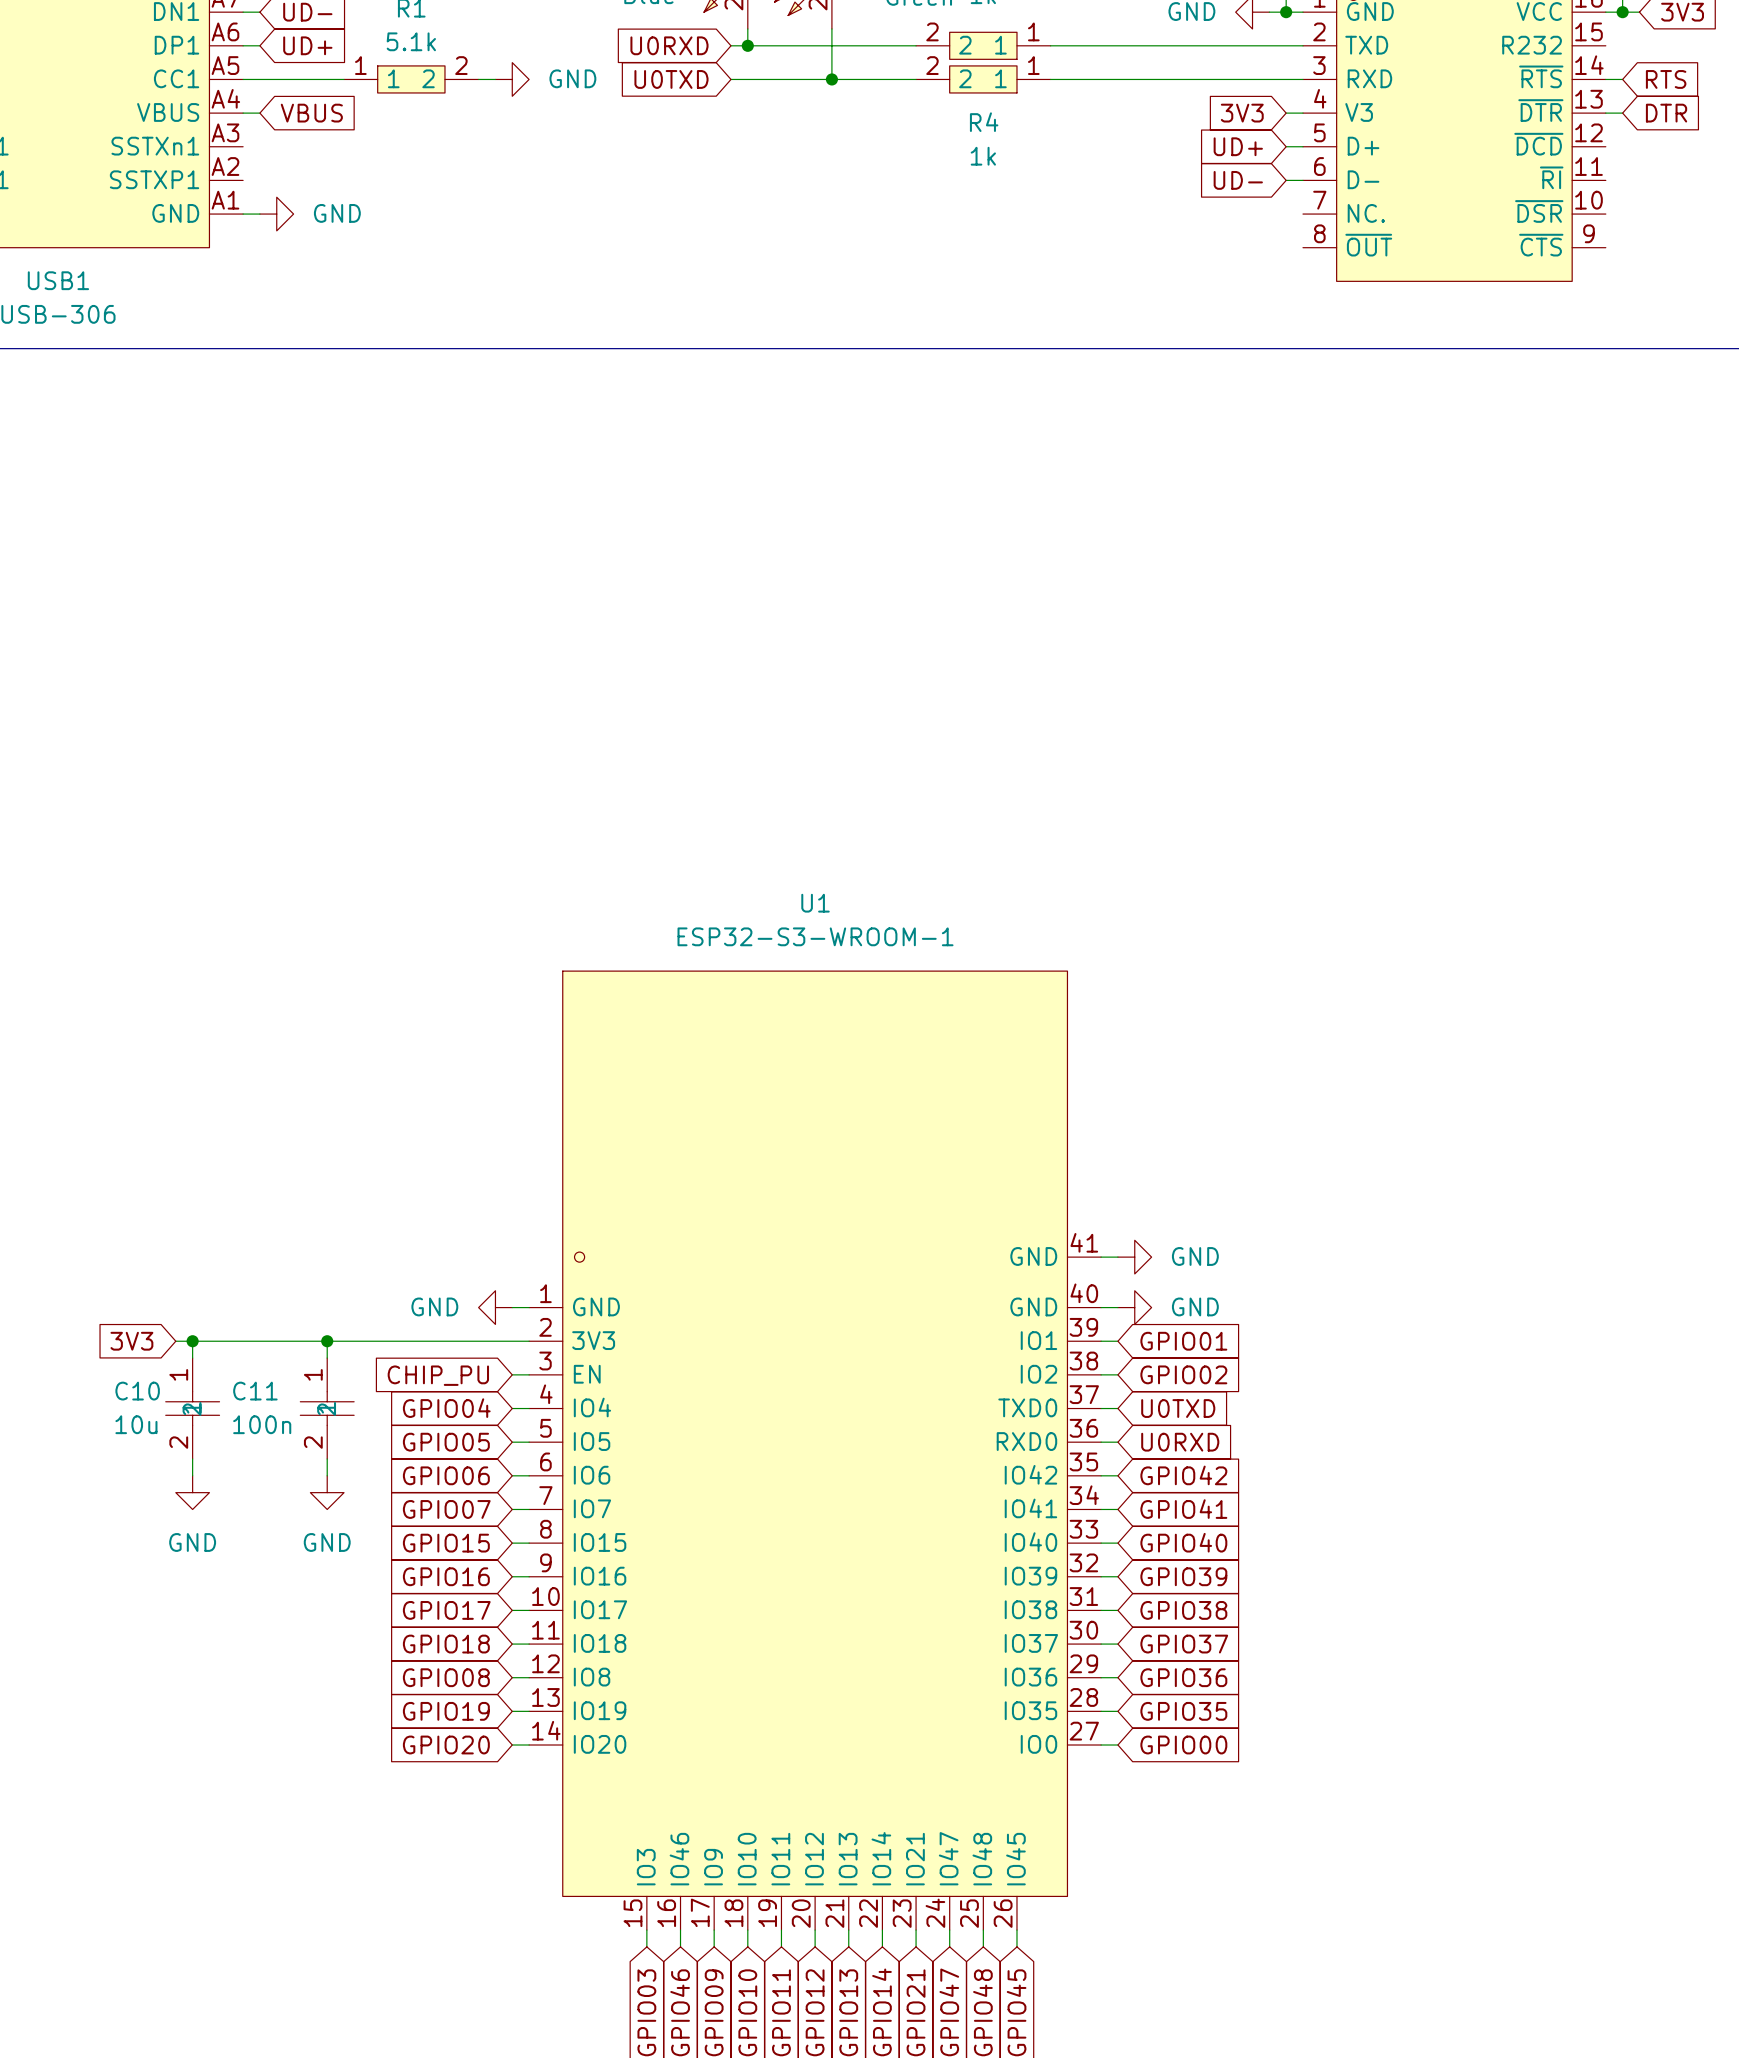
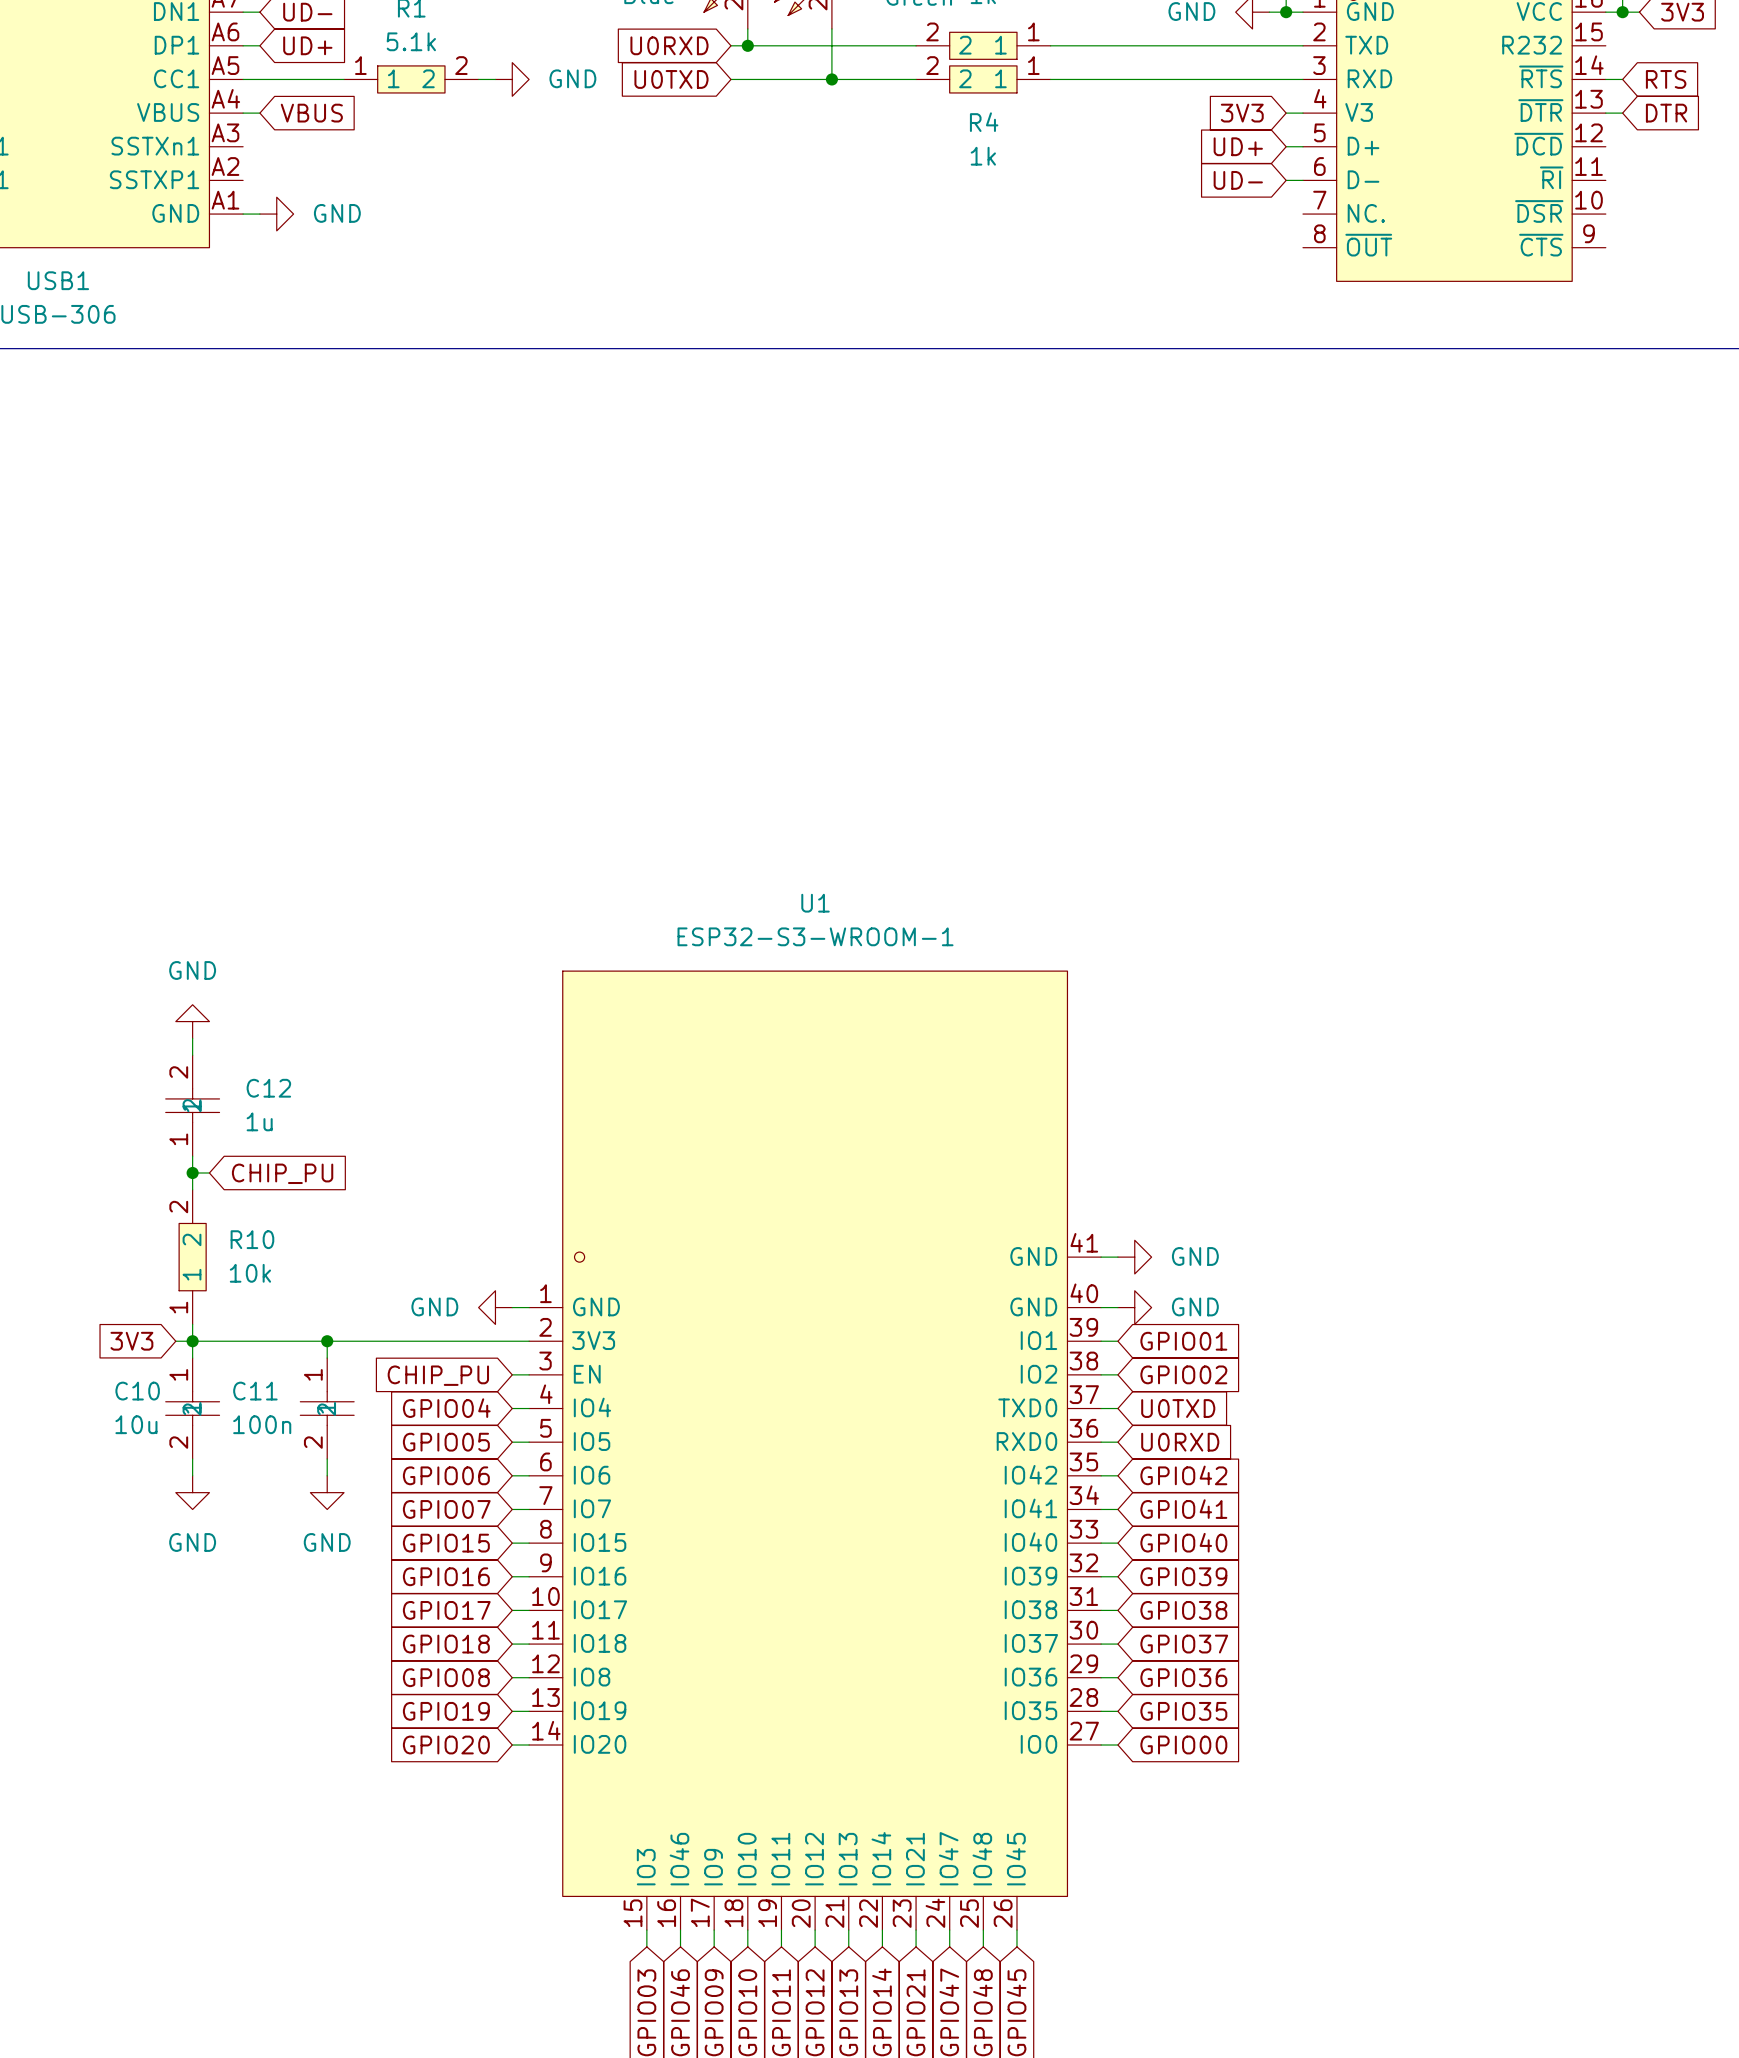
power symbol: none -> GND (192, 1021)
wire: none -> (192, 1038) (192, 1055)
C12: none -> 1u (192, 1105)
wire: none -> (192, 1156) (192, 1189)
wire: none -> (192, 1172) (209, 1172)
junction: none -> (192, 1172)
global label: none -> CHIP_PU (282, 1173)
R10: none -> 10k (192, 1257)
wire: none -> (192, 1324) (192, 1341)

